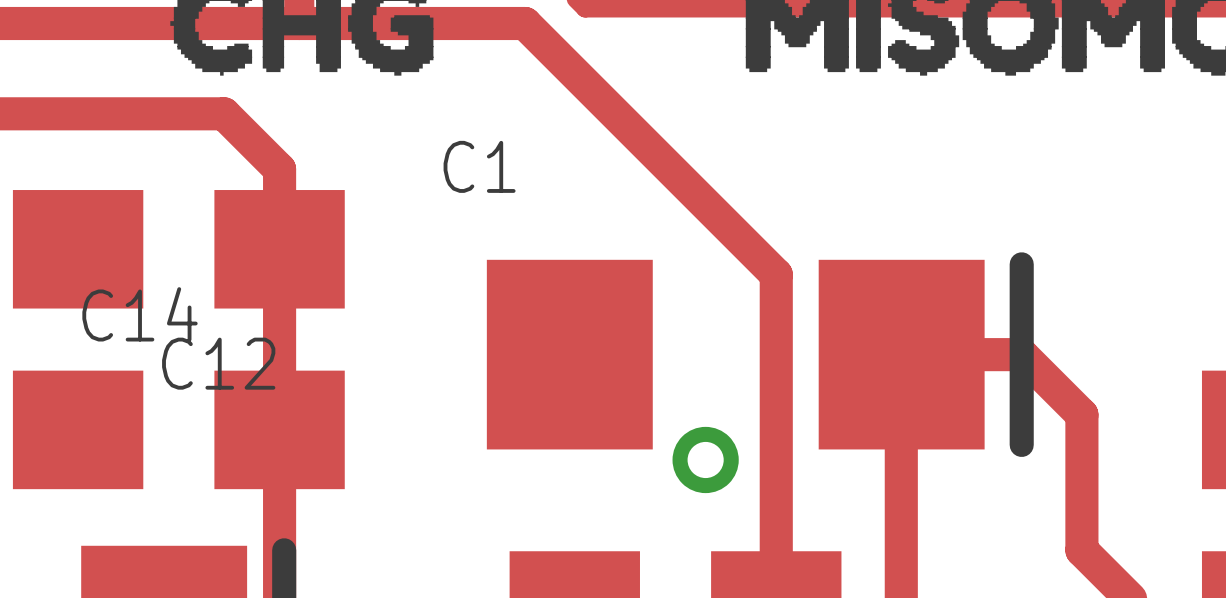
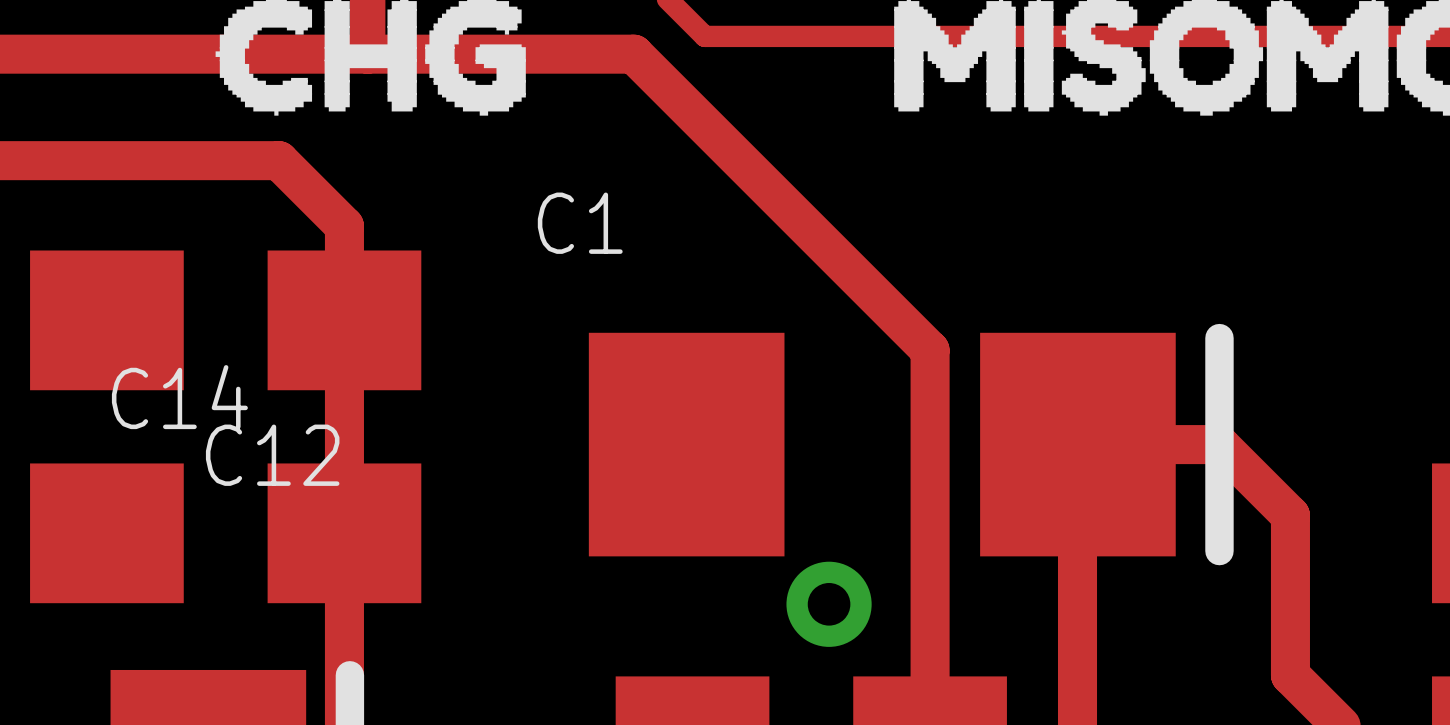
via position: (705, 459) -> (829, 604)

